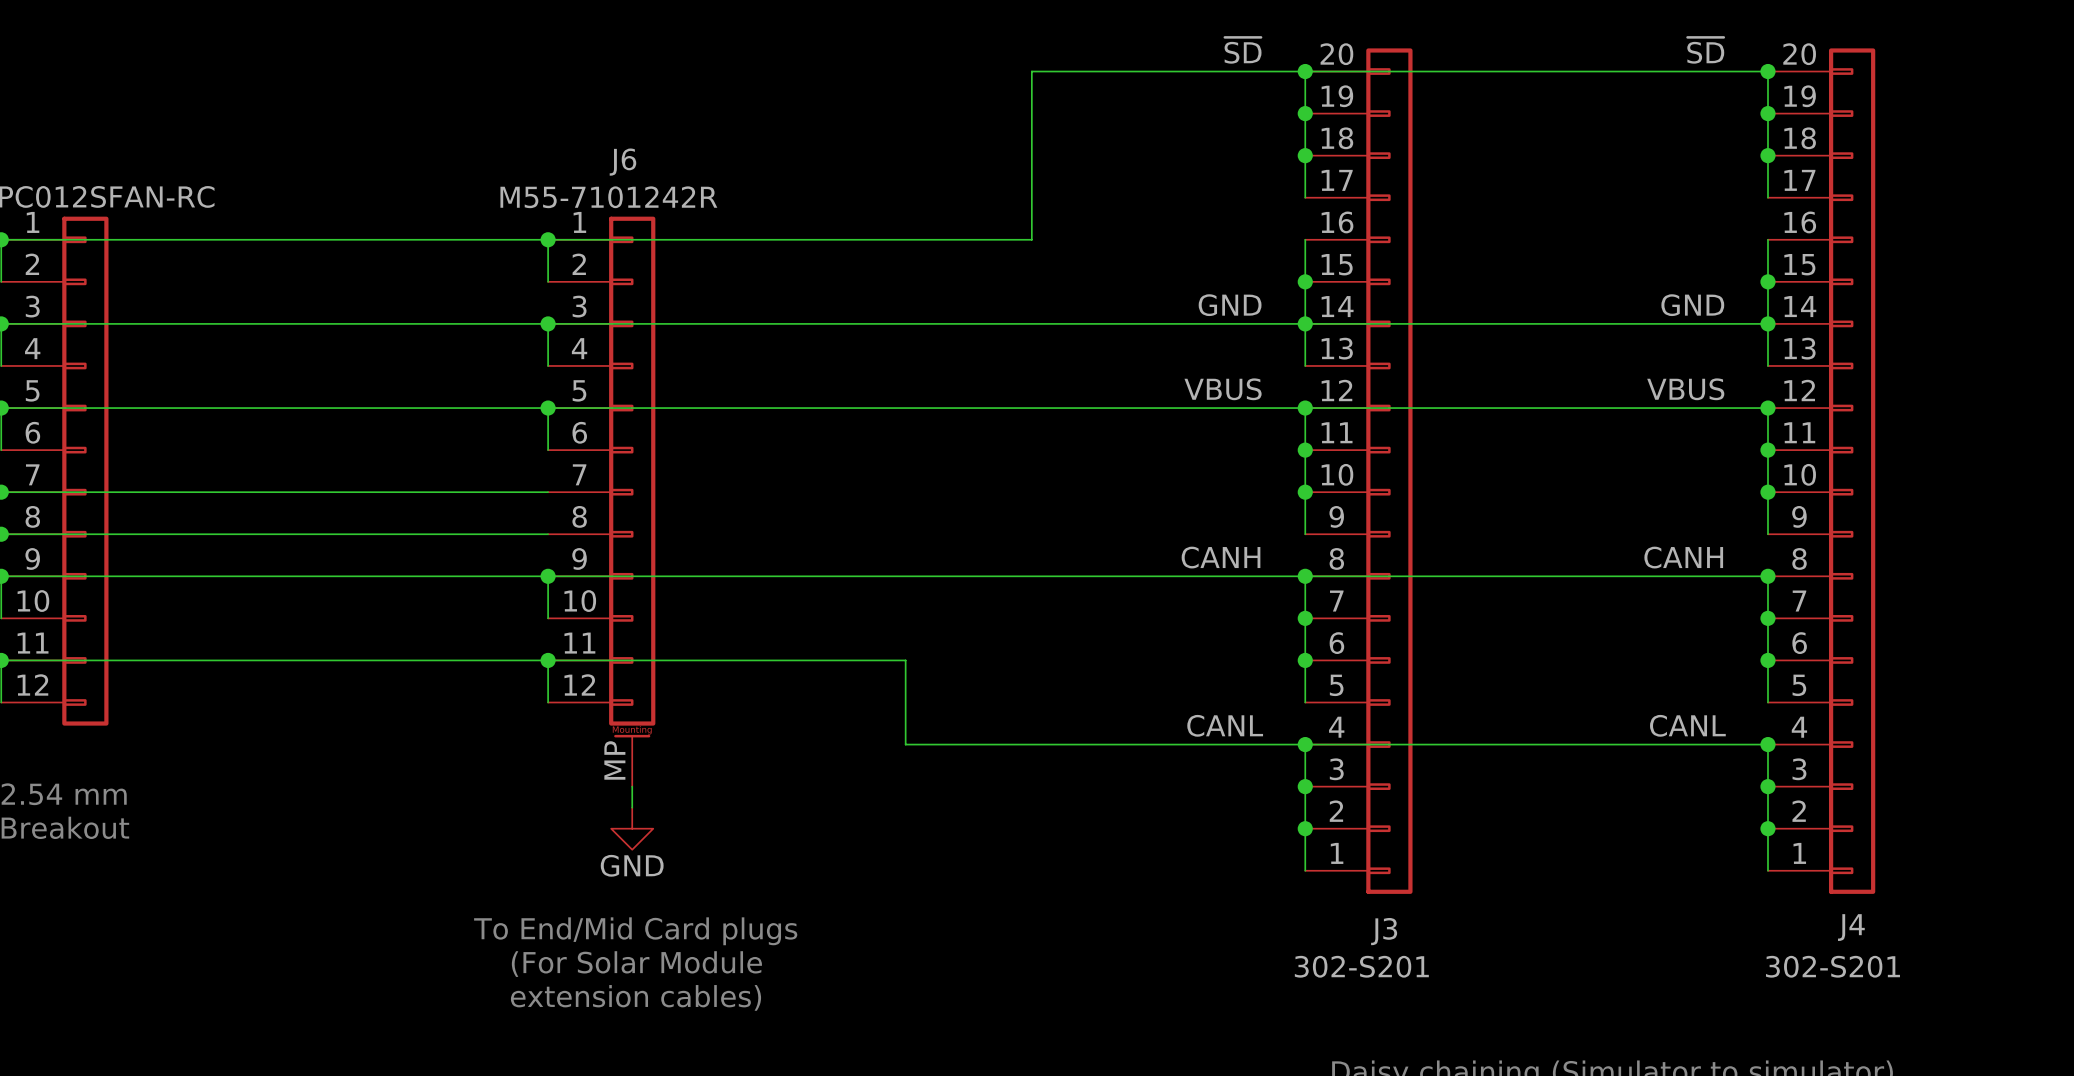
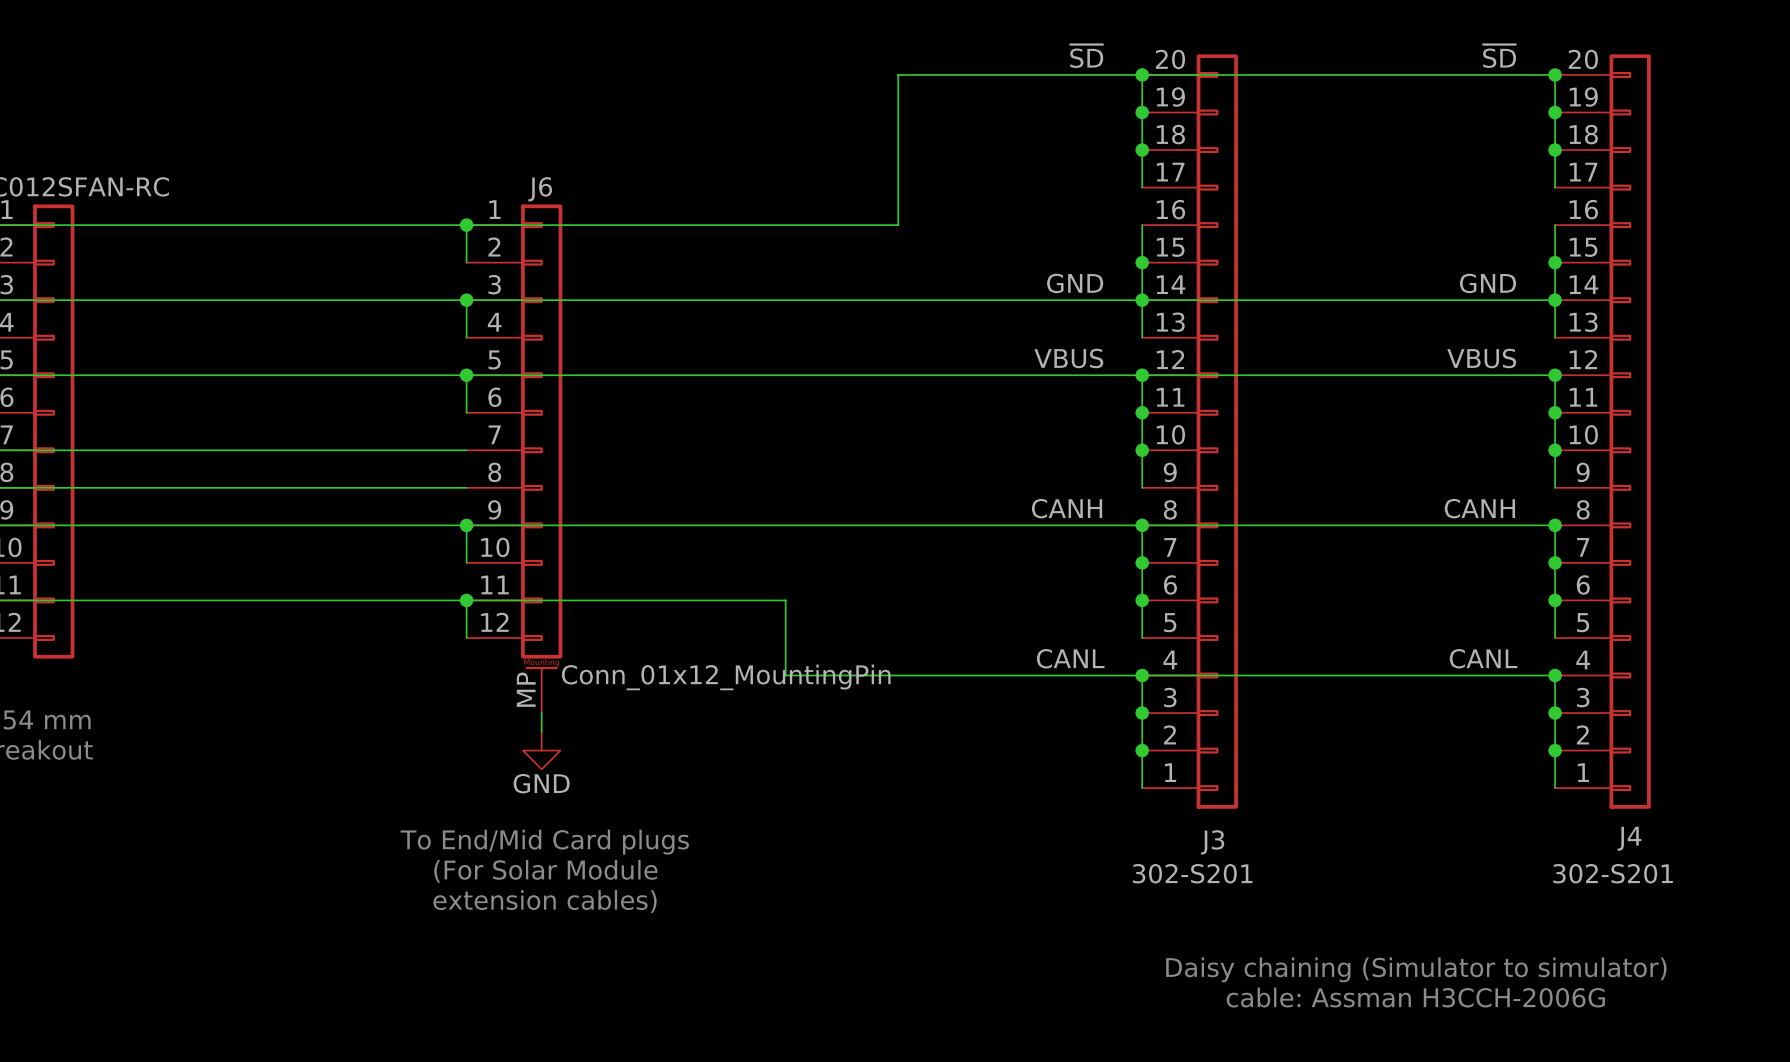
J6 name position: J6 (622, 162) -> J6 (540, 189)
J6 value: M55-7101242R (608, 197) -> Conn_01x12_MountingPin (726, 677)

